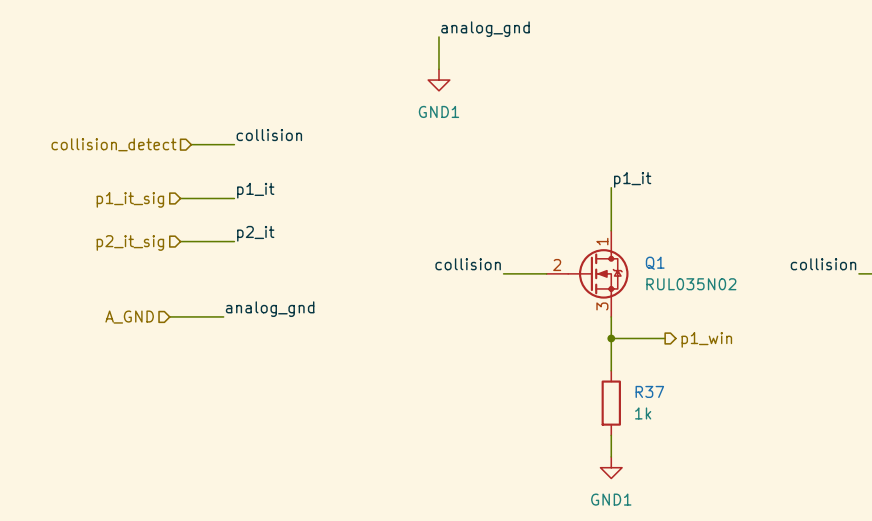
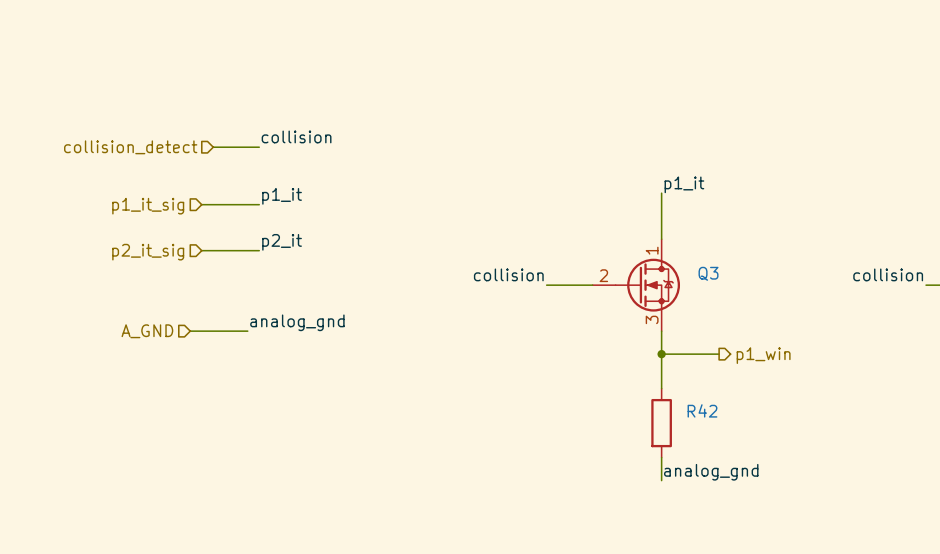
label: analog_gnd (485, 29) -> none
wire: (438, 36) (438, 69) -> none
power symbol: GND1 (438, 80) -> none
Q1 name: Q1 (655, 263) -> Q3 (708, 273)
Q1 value: RUL035N02 (691, 284) -> none
R37 name: R37 (649, 391) -> R42 (702, 410)
R37 value: 1k (643, 413) -> none
label: none -> analog_gnd (711, 472)
power symbol: GND1 (611, 467) -> none

